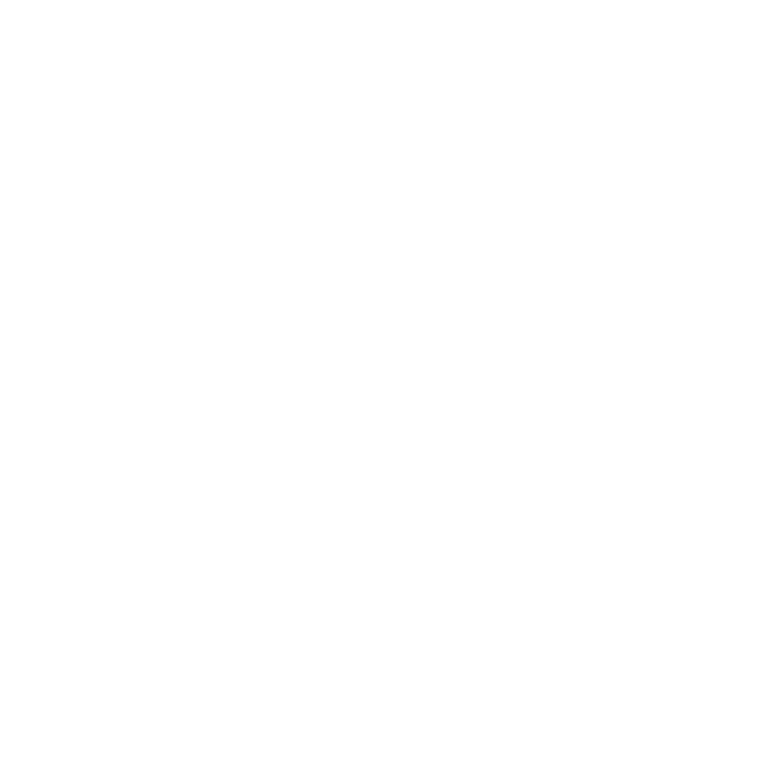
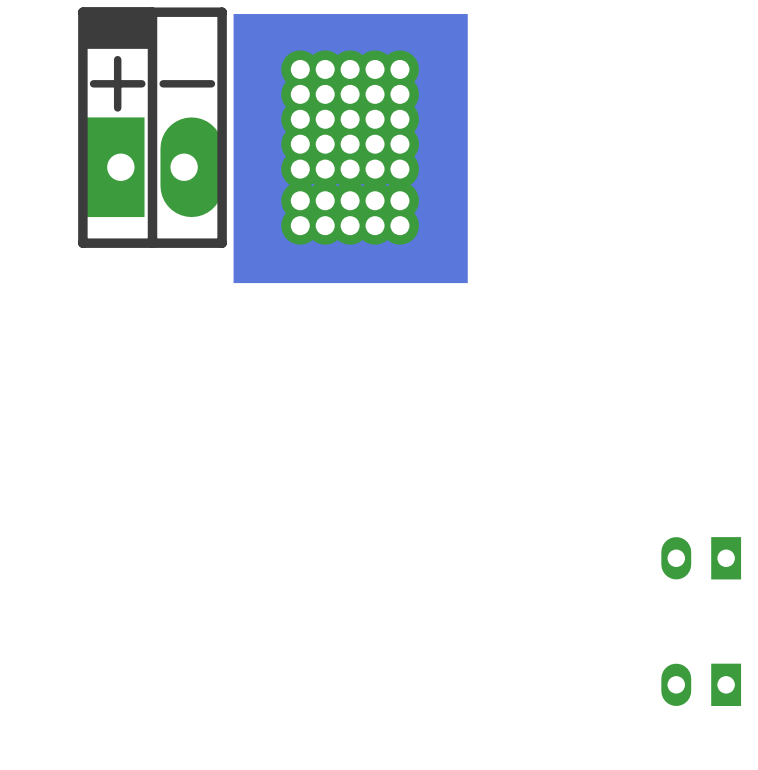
part: none -> (152, 127)
part: none -> (350, 148)
part: none -> (701, 558)
part: none -> (701, 684)

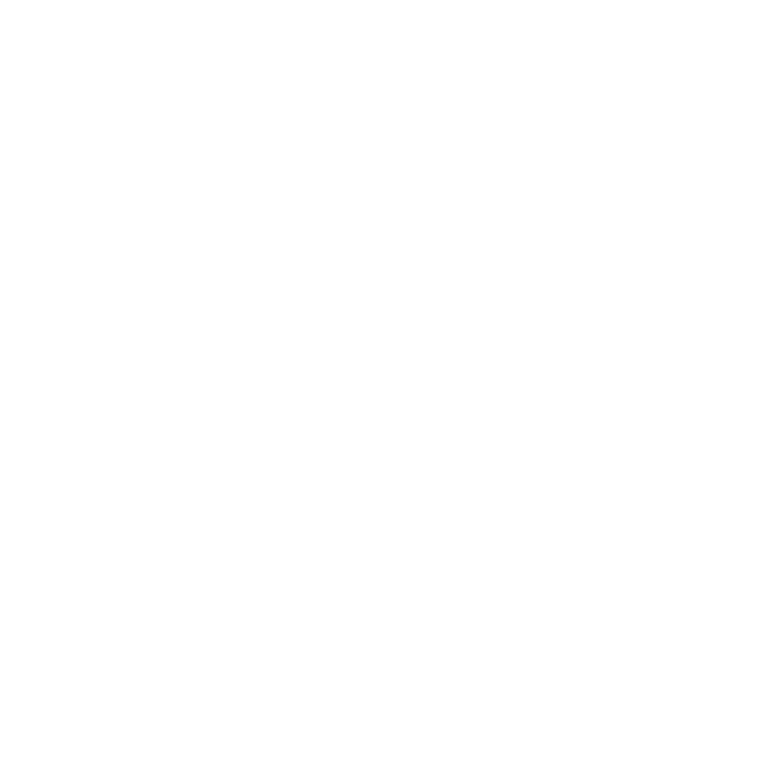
part: (152, 127) -> none
part: (350, 148) -> none
part: (701, 558) -> none
part: (701, 684) -> none

